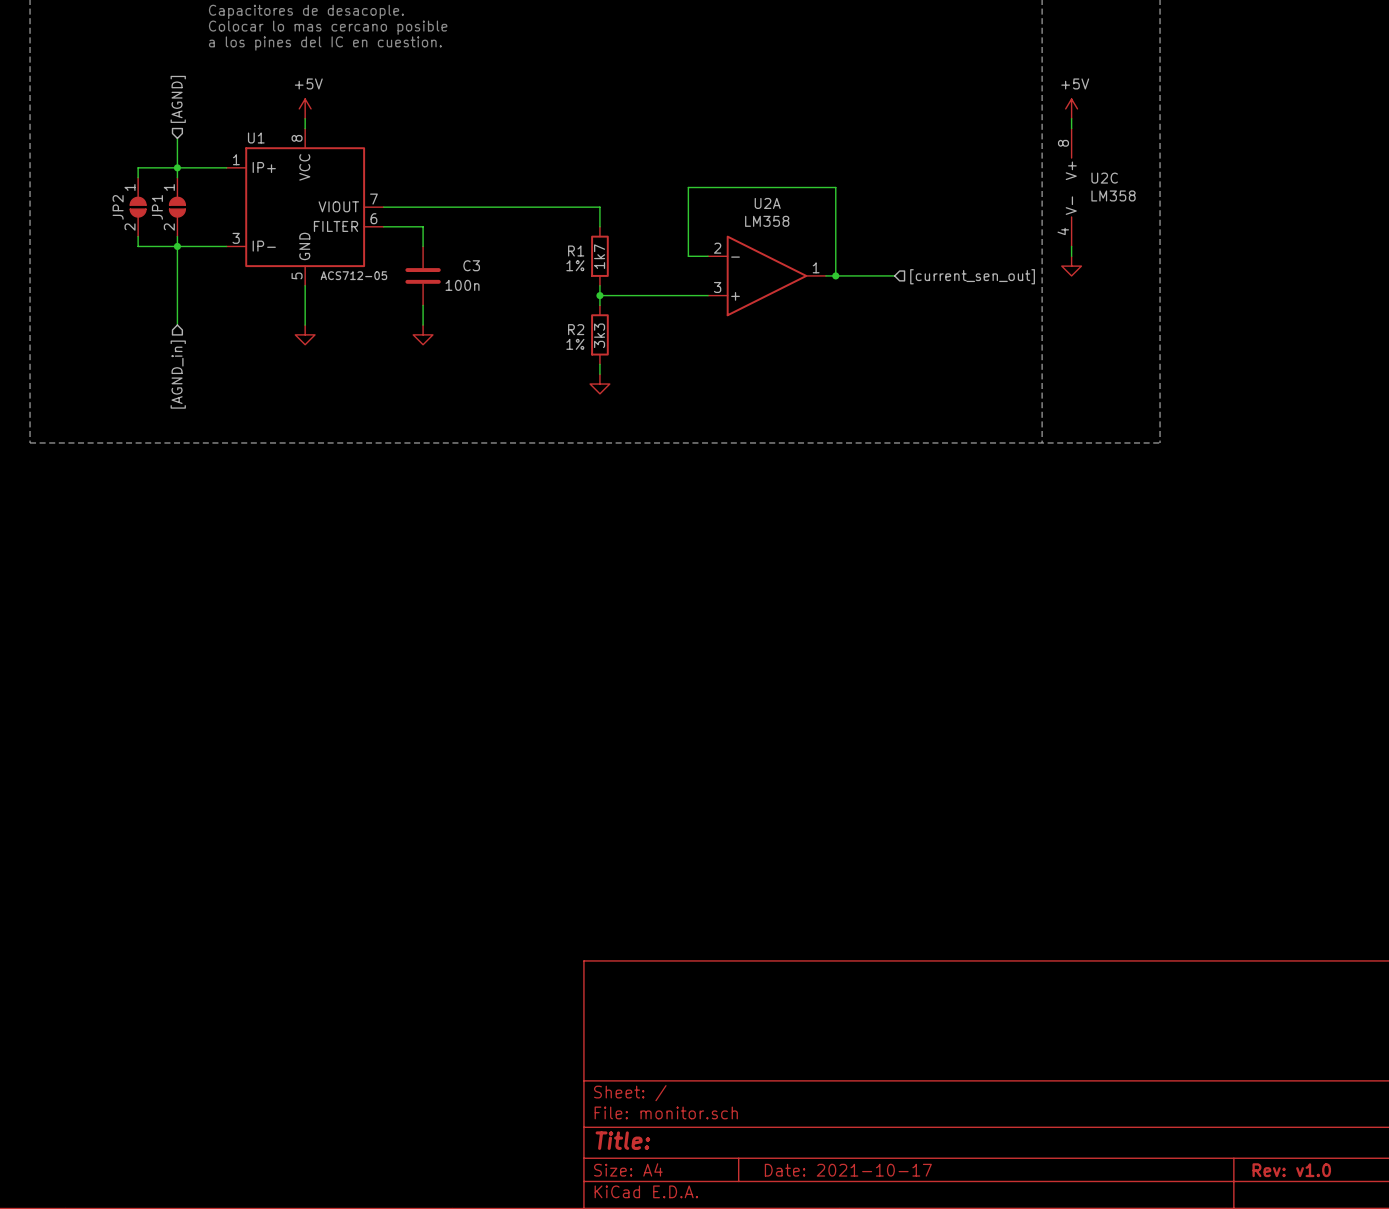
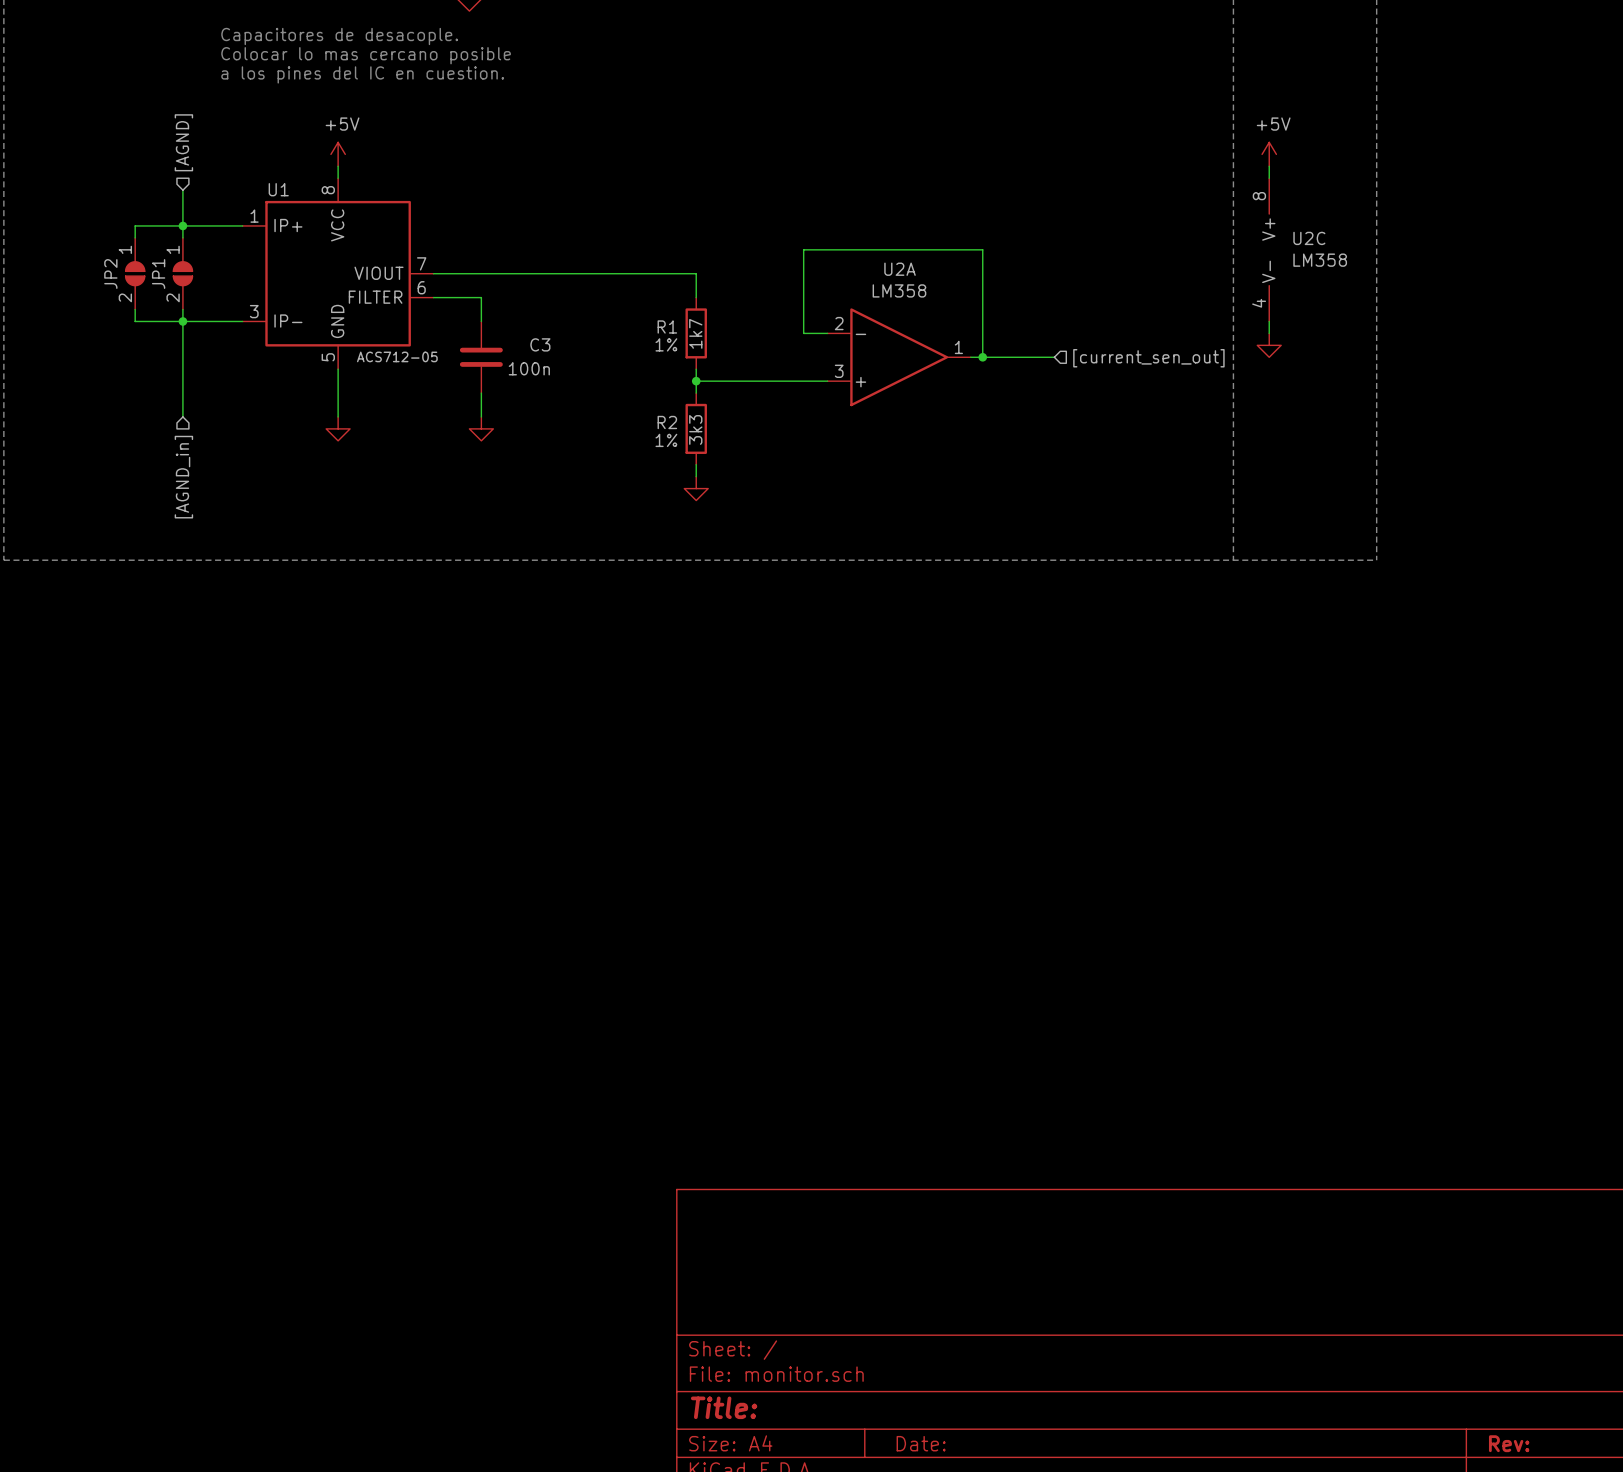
title block: Date: 2021-10-17 (848, 1170) -> Date: (921, 1443)
title block: Rev: v1.0 (1291, 1170) -> Rev: (1509, 1443)

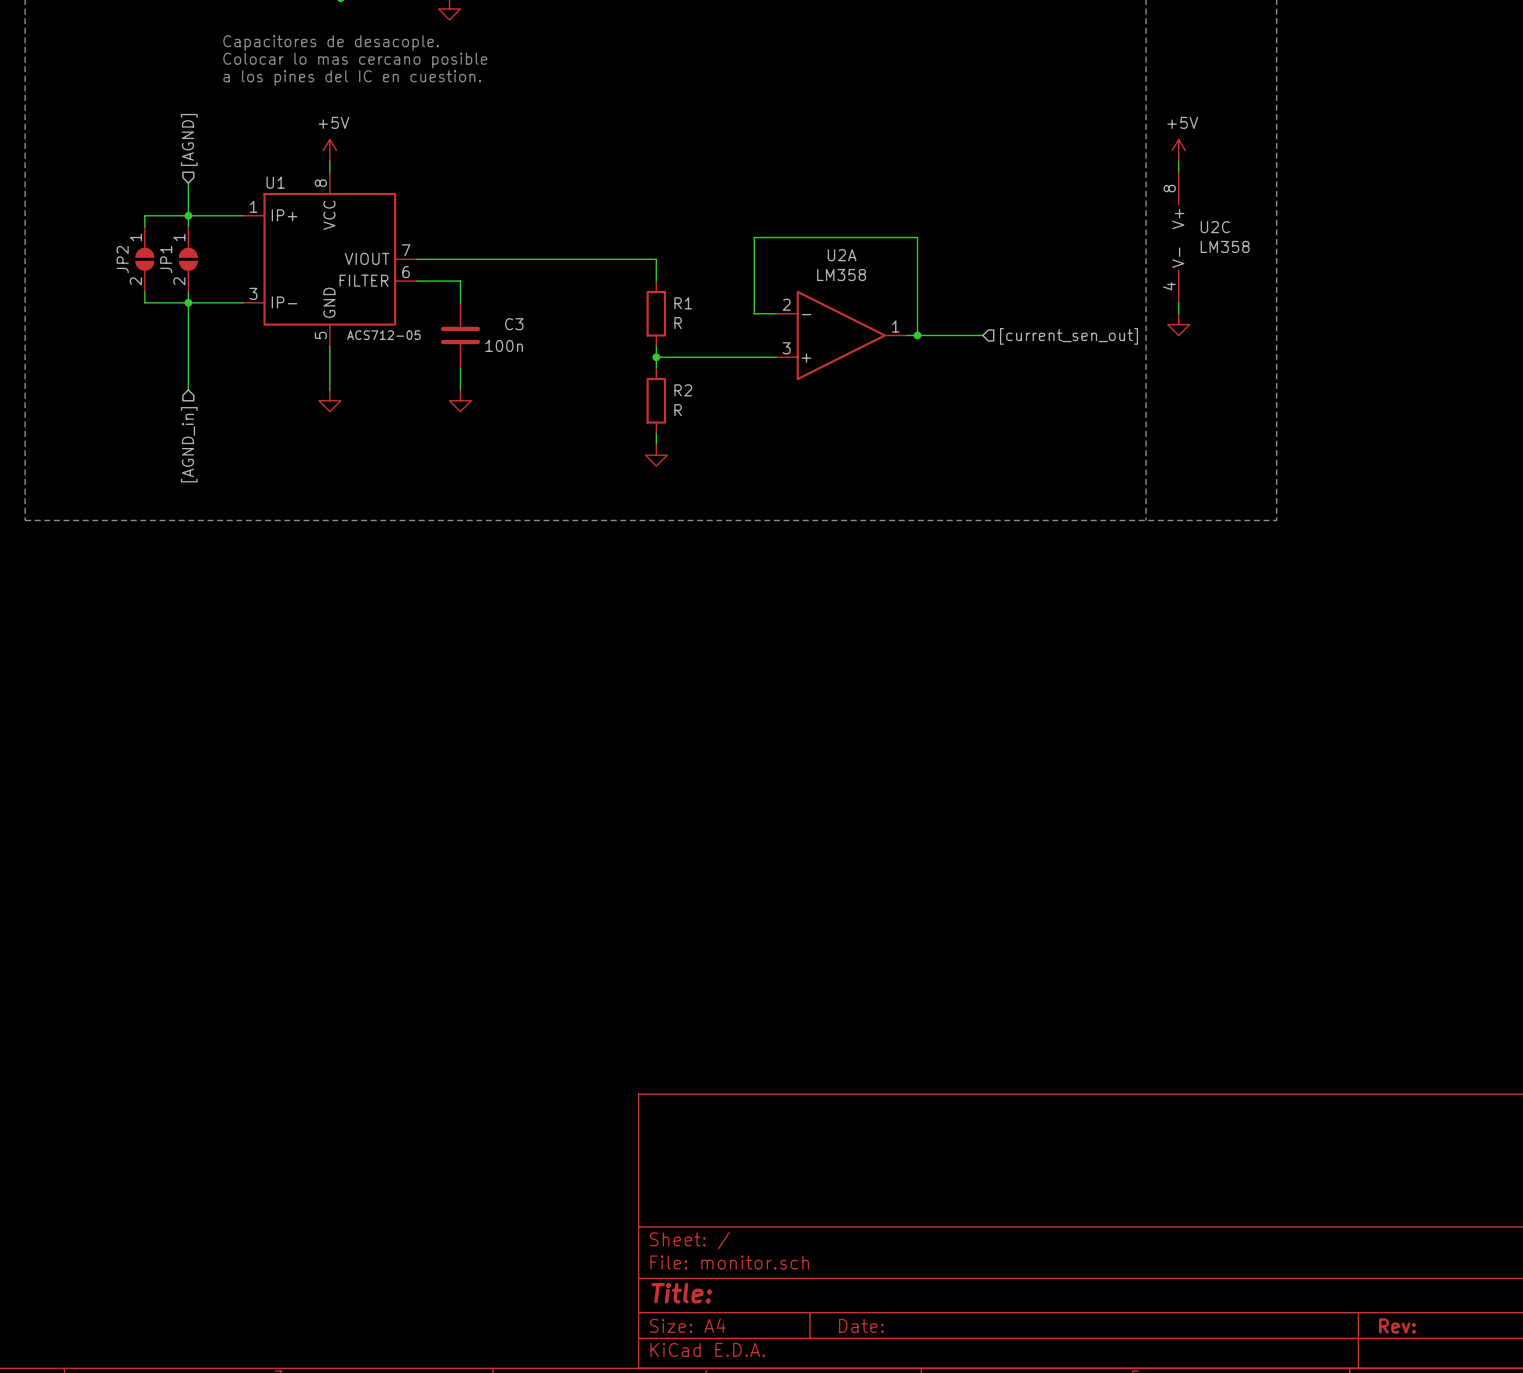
R1 name position: R1 (667, 326) -> R1 (683, 303)
R1 value: 1k7 (695, 333) -> R (678, 323)
R1 text: 1% (666, 344) -> none
R2 name position: R2 (667, 422) -> R2 (683, 390)
R2 value: 3k3 (695, 429) -> R (678, 410)
R2 text: 1% (666, 440) -> none

